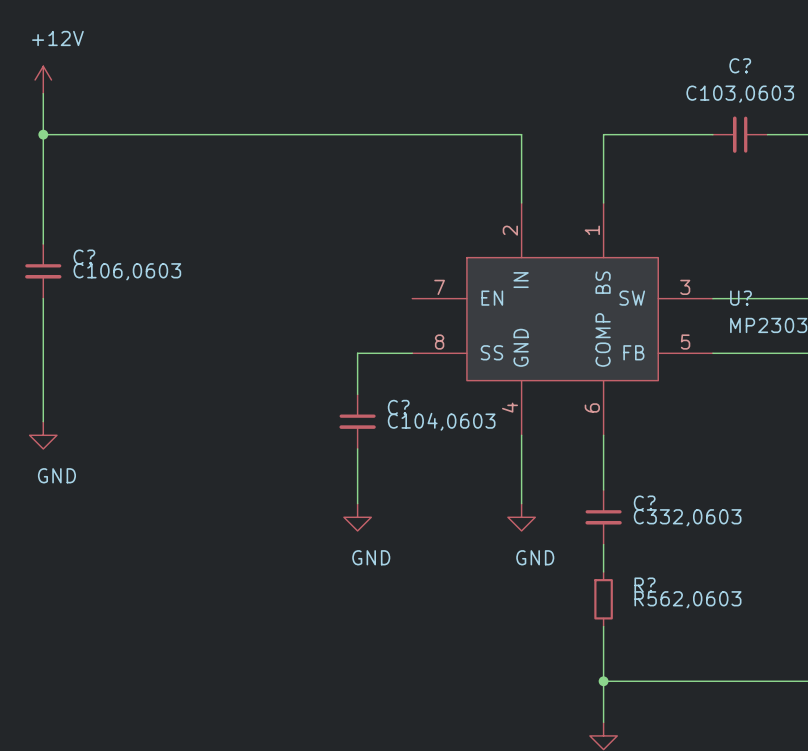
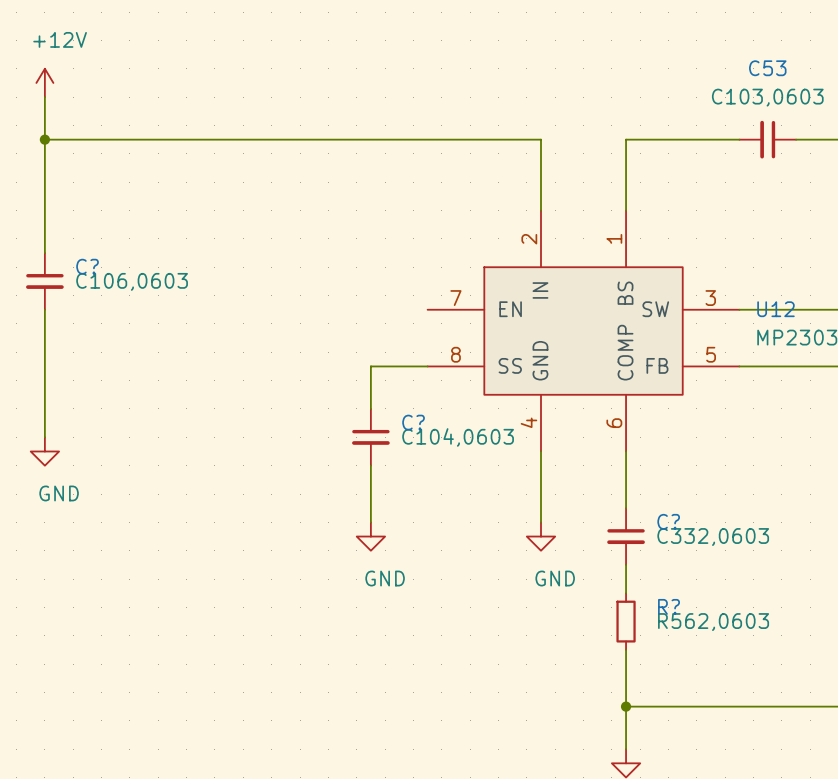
C? name: C? (740, 65) -> C53 (767, 68)
U? name: U? (741, 298) -> U12 (775, 309)

